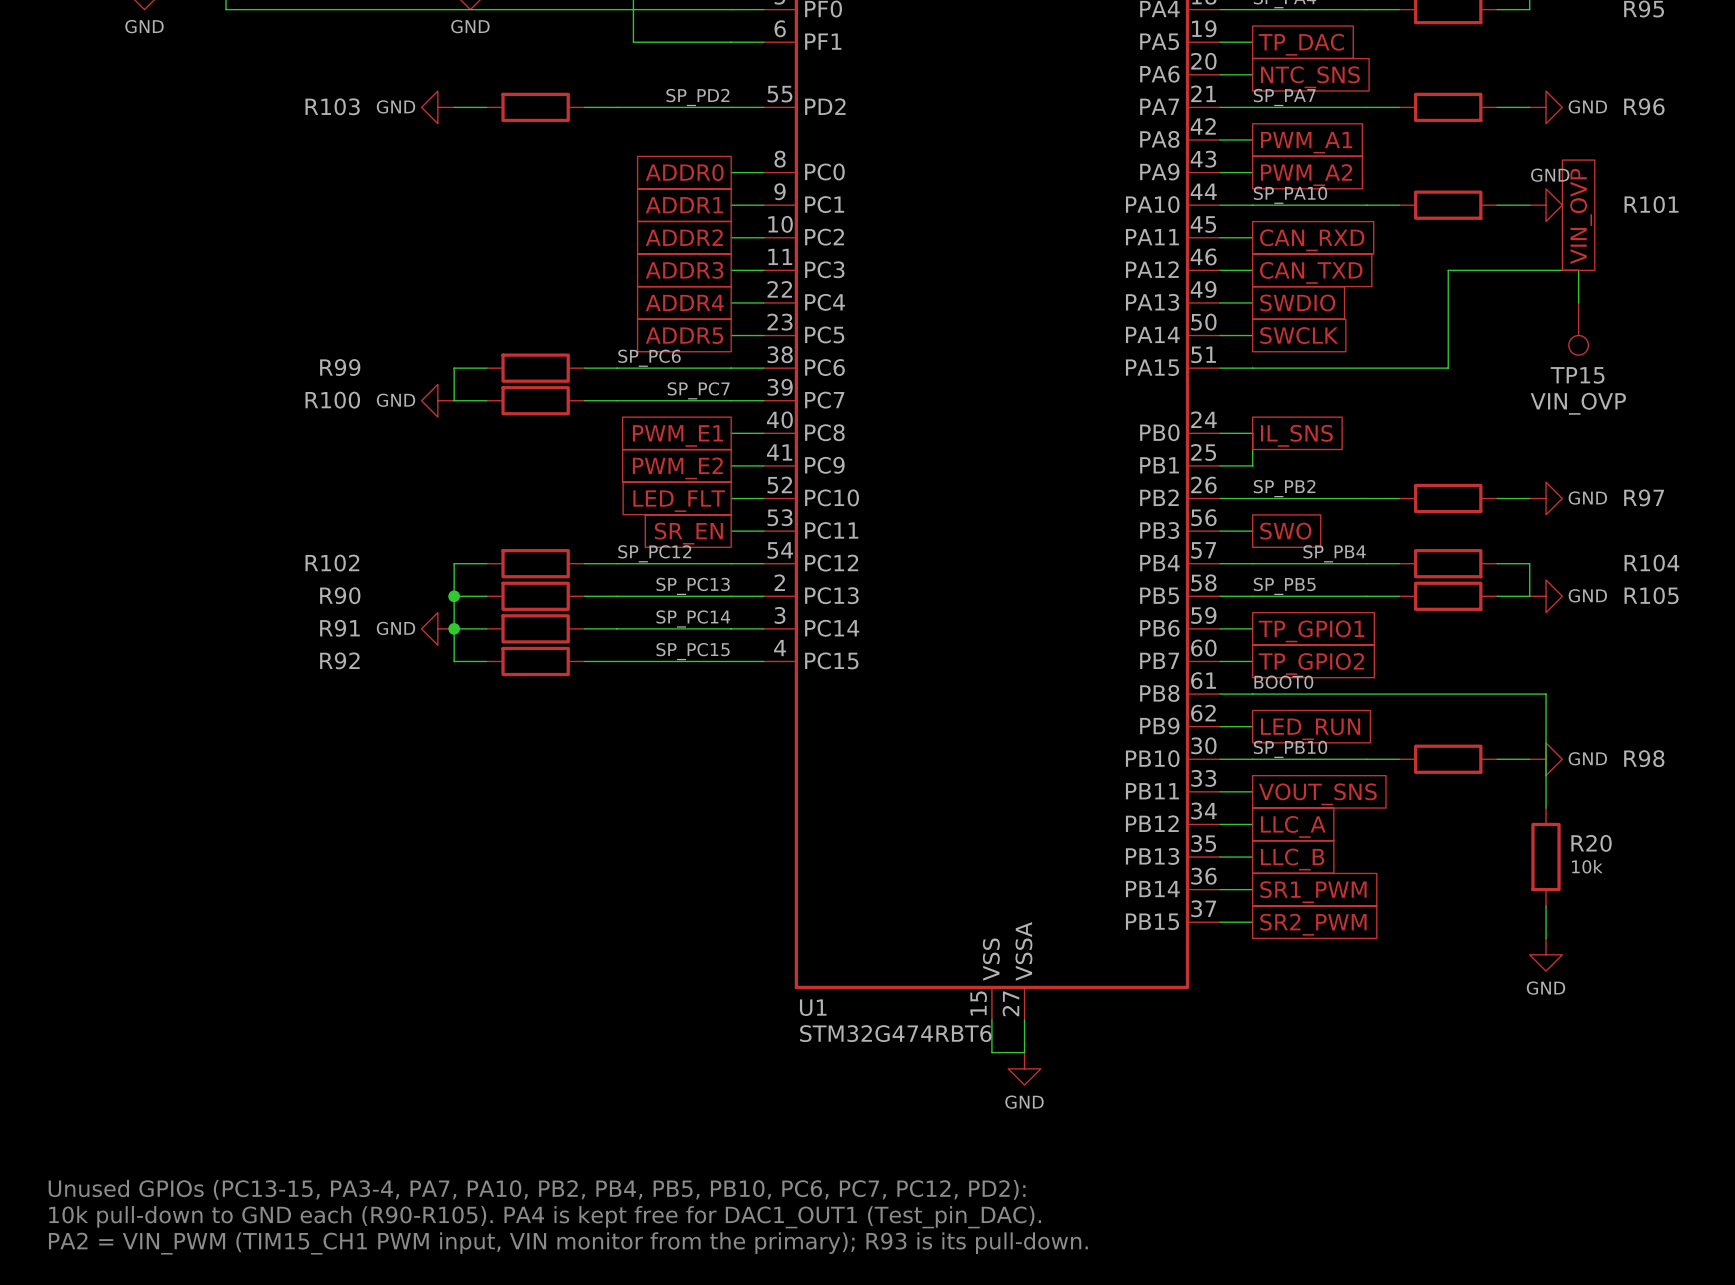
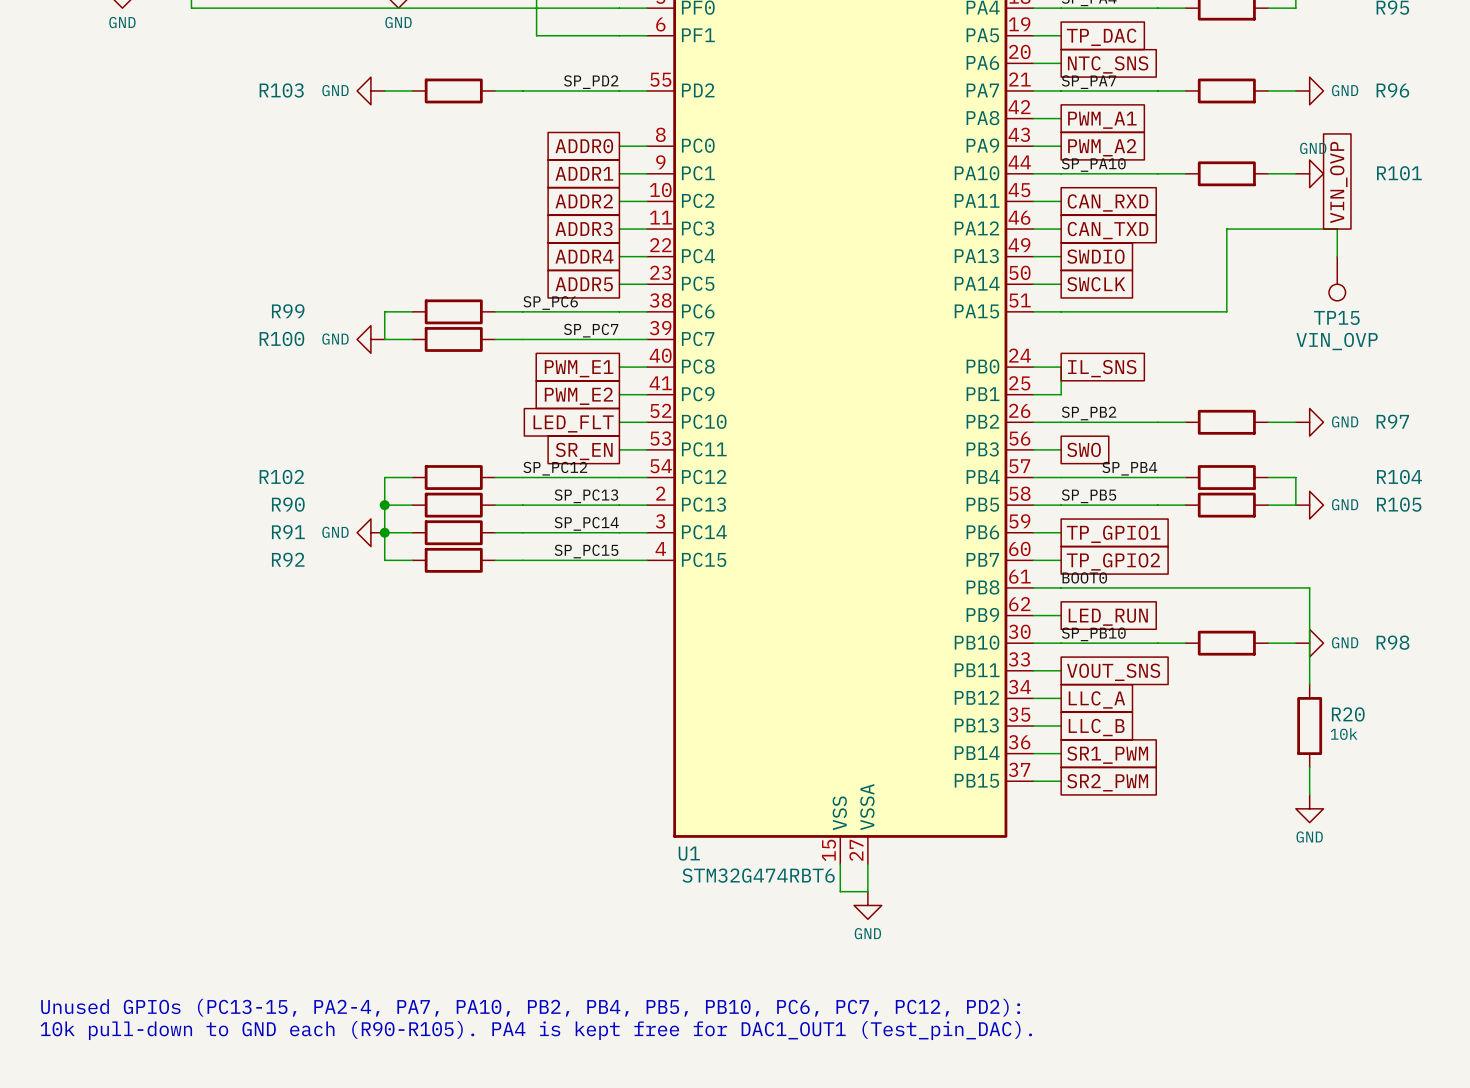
text: Unused GPIOs (PC13-15, PA3-4, PA7, PA10, PB2, PB4, PB5, PB10, PC6, PC7, PC12, PD2): (537, 1189) -> Unused GPIOs (PC13-15, PA2-4, PA7, PA10, PB2, PB4, PB5, PB10, PC6, PC7, PC12, PD2): (530, 1007)
text: PA2 = VIN_PWM (TIM15_CH1 PWM input, VIN monitor from the primary); R93 is its pull-down. (568, 1243) -> none

